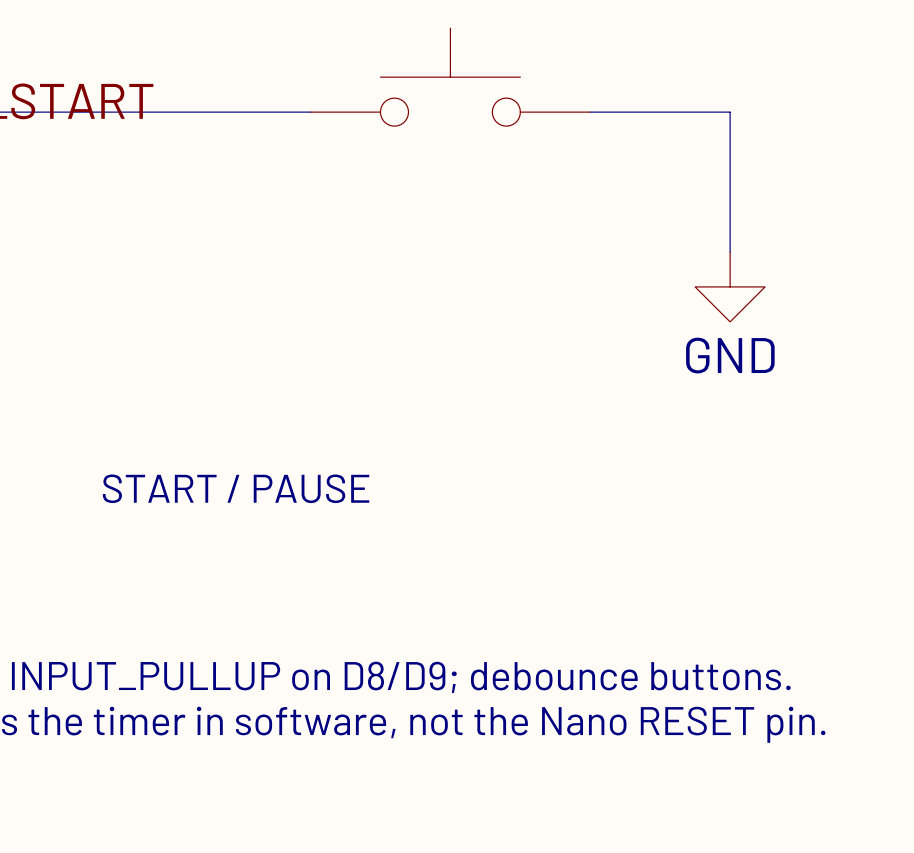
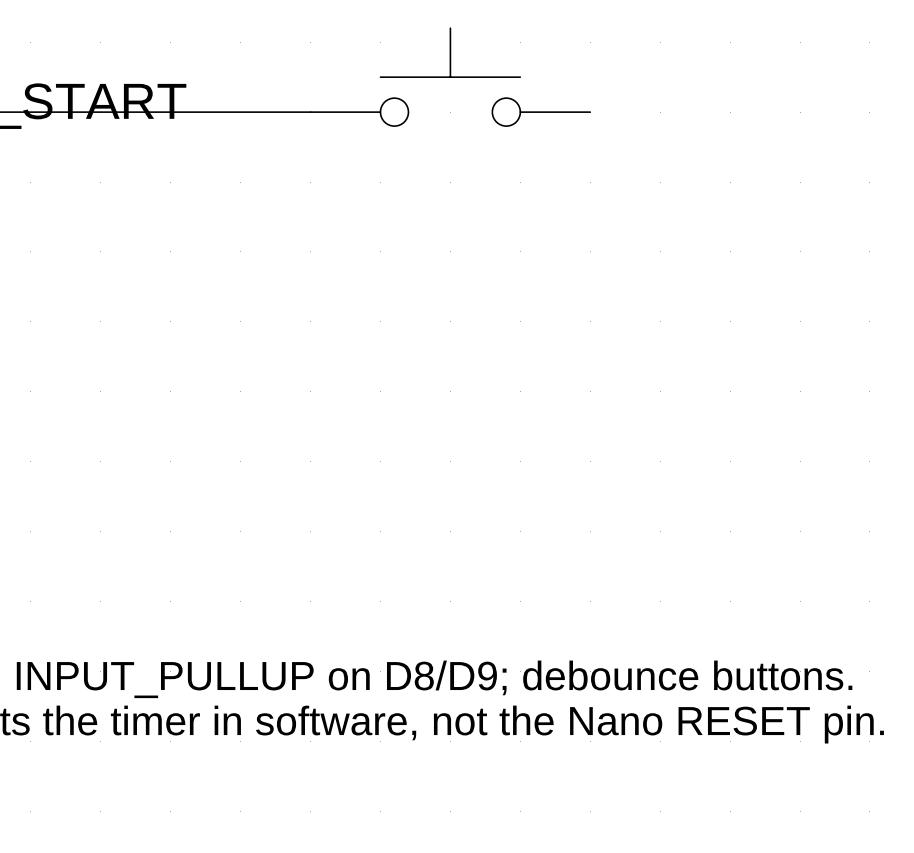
wire: (590, 112) (730, 112) (730, 251) -> none
power symbol: GND (730, 286) -> none
text: START / PAUSE (236, 488) -> none

